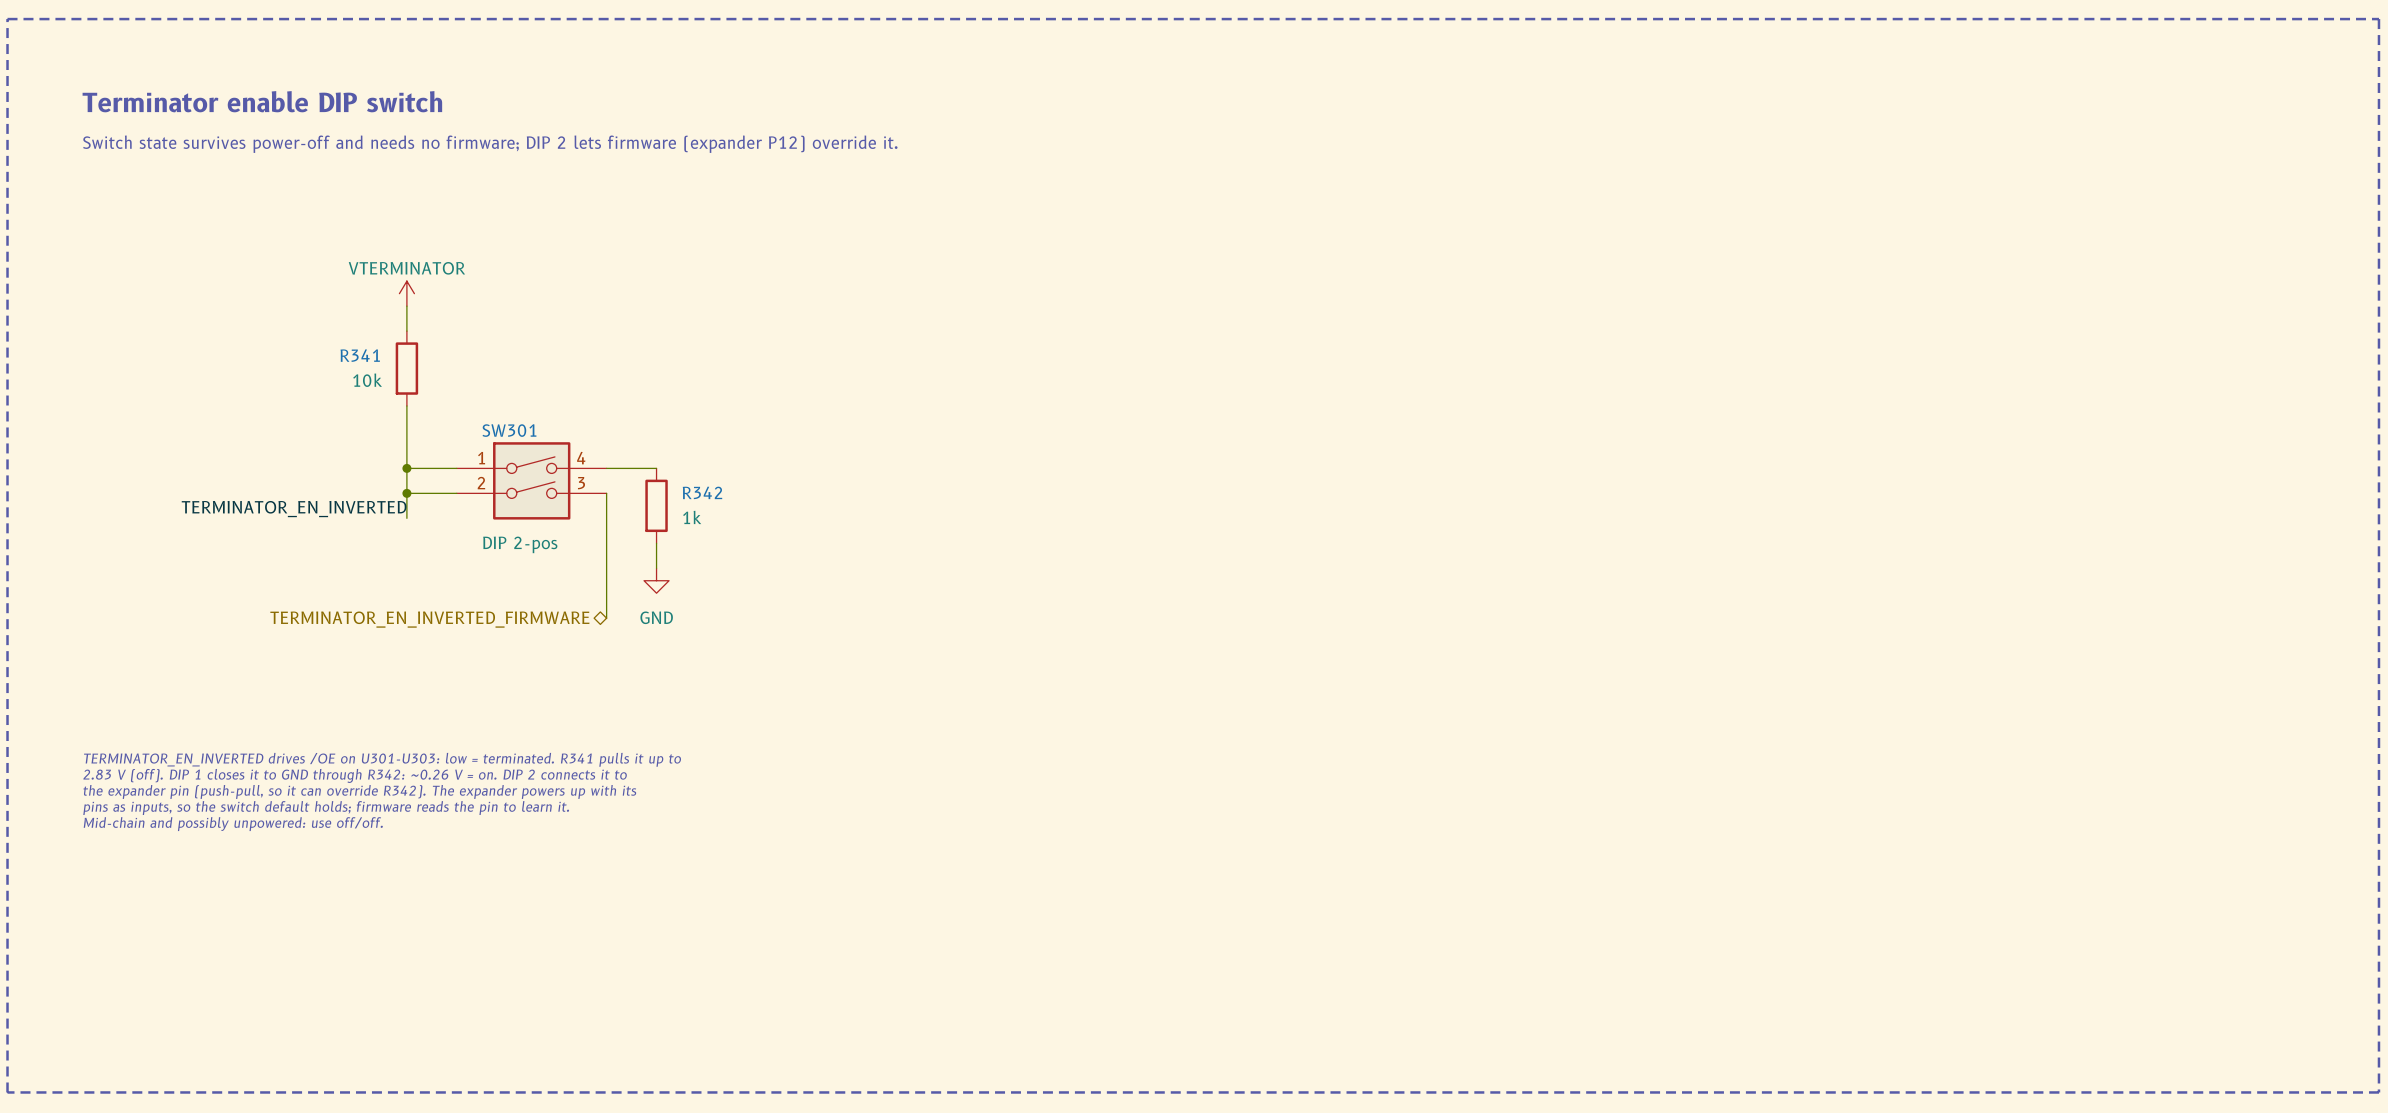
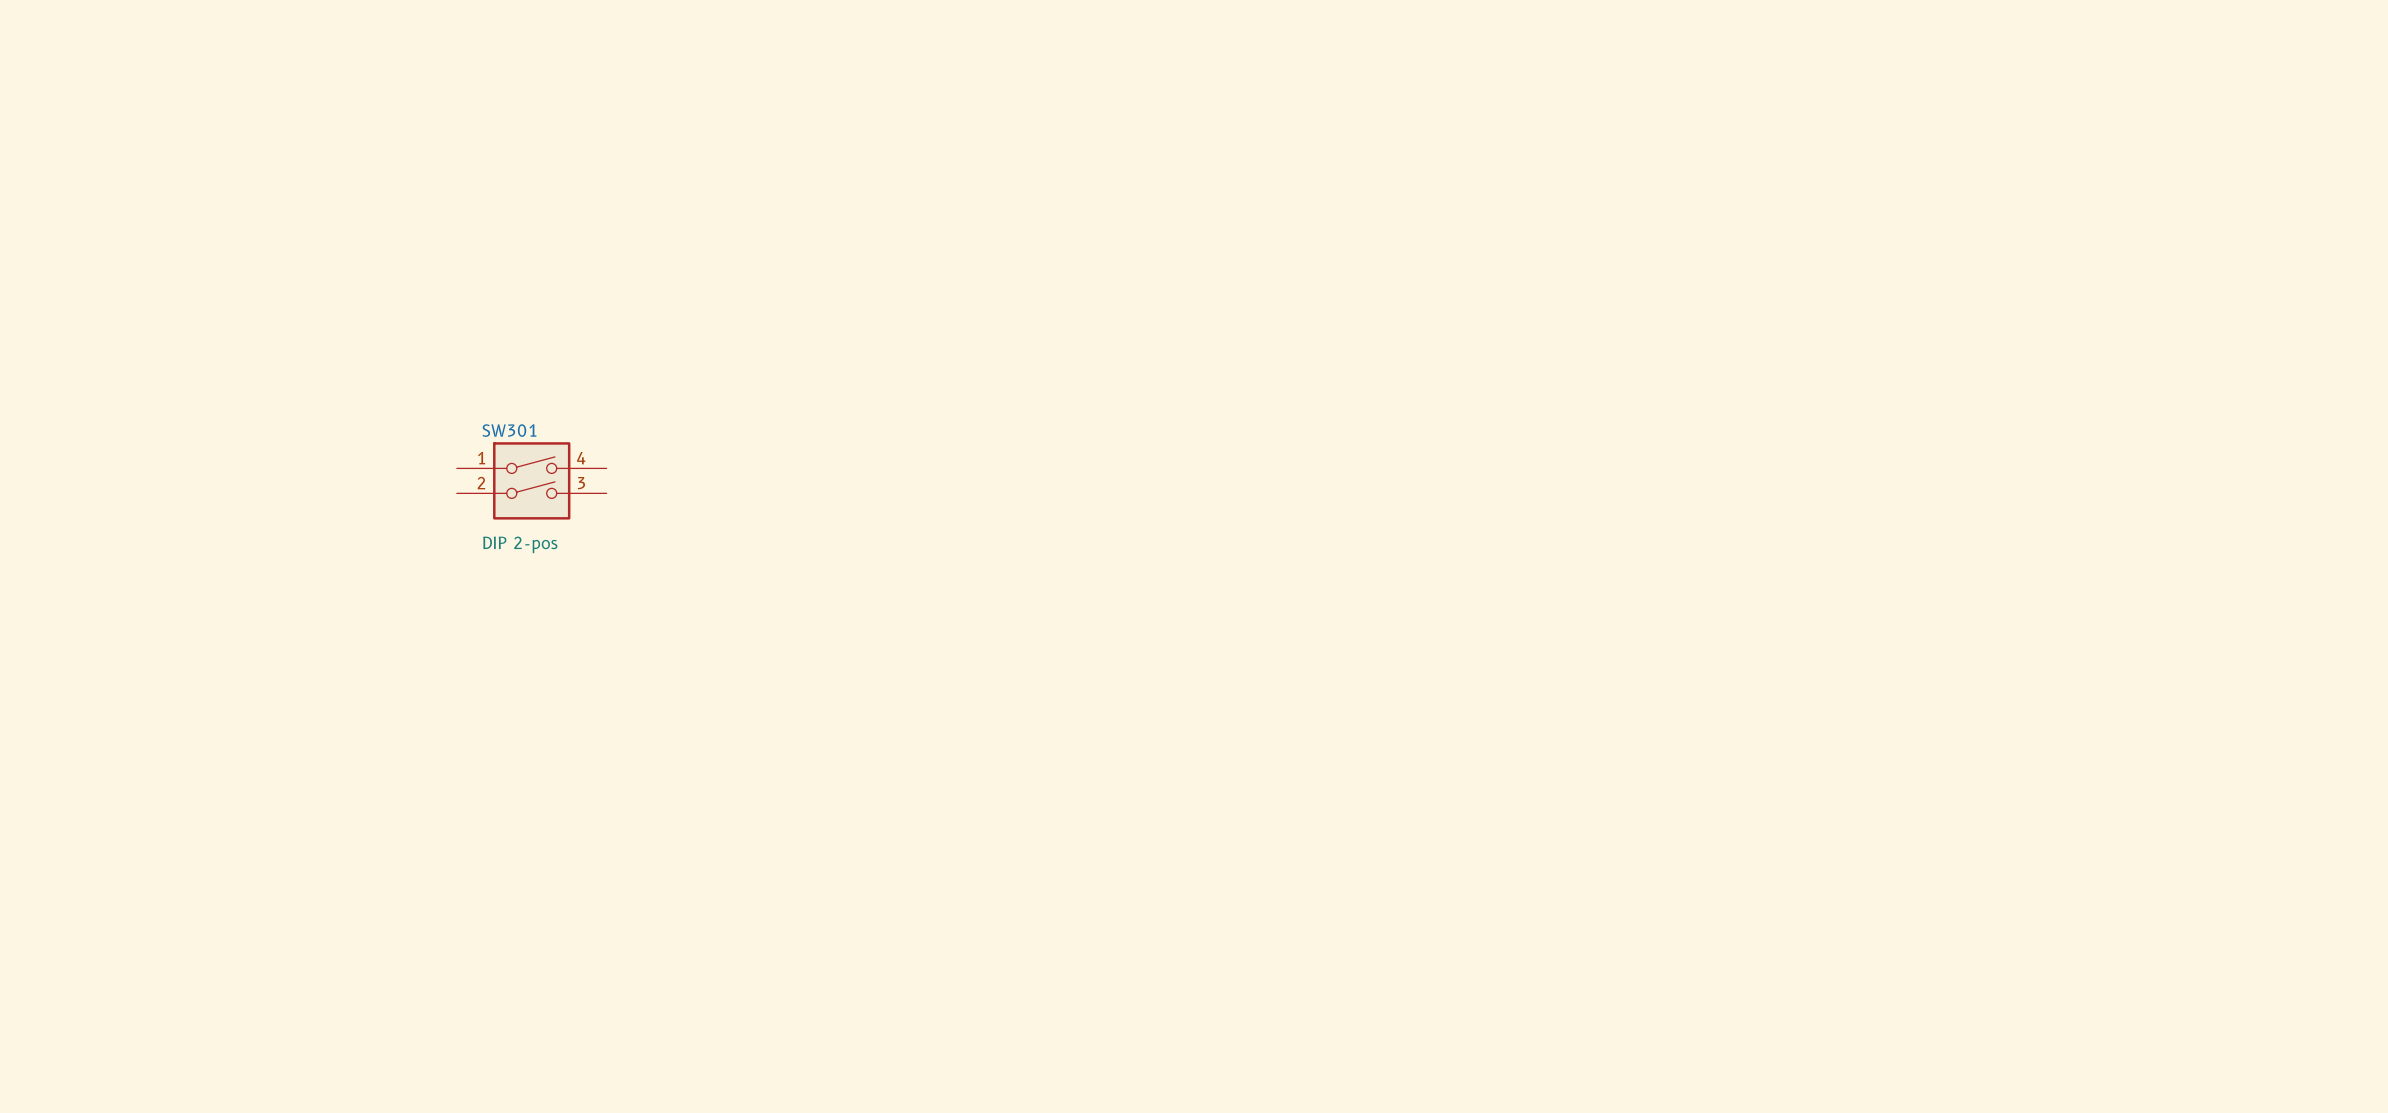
line: (7, 19) (2378, 19) (2378, 1092) (7, 1092) (7, 19) -> none
text: Terminator enable DIP switch (262, 101) -> none
text: Switch state survives power-off and needs no firmware; DIP 2 lets firmware (expander P12) override it. (490, 144) -> none
power symbol: VTERMINATOR (406, 293) -> none
wire: (406, 306) (406, 331) -> none
R341: 10k (406, 368) -> none
wire: (406, 405) (406, 518) -> none
wire: (406, 468) (456, 468) -> none
junction: (406, 468) -> none
wire: (606, 468) (656, 468) -> none
wire: (406, 493) (456, 493) -> none
junction: (406, 493) -> none
wire: (606, 493) (606, 618) -> none
R342: 1k (656, 505) -> none
label: TERMINATOR_EN_INVERTED (294, 509) -> none
wire: (656, 543) (656, 568) -> none
power symbol: GND (656, 580) -> none
hierarchical label: TERMINATOR_EN_INVERTED_FIRMWARE (429, 619) -> none
text: TERMINATOR_EN_INVERTED drives /OE on U301-U303: low = terminated. R341 pulls it up to (382, 759) -> none
text: 2.83 V (off). DIP 1 closes it to GND through R342: ~0.26 V = on. DIP 2 connects it to (355, 775) -> none
text: the expander pin (push-pull, so it can override R342). The expander powers up with its (359, 791) -> none
text: pins as inputs, so the switch default holds; firmware reads the pin to learn it. (326, 808) -> none
text: Mid-chain and possibly unpowered: use off/off. (233, 824) -> none

